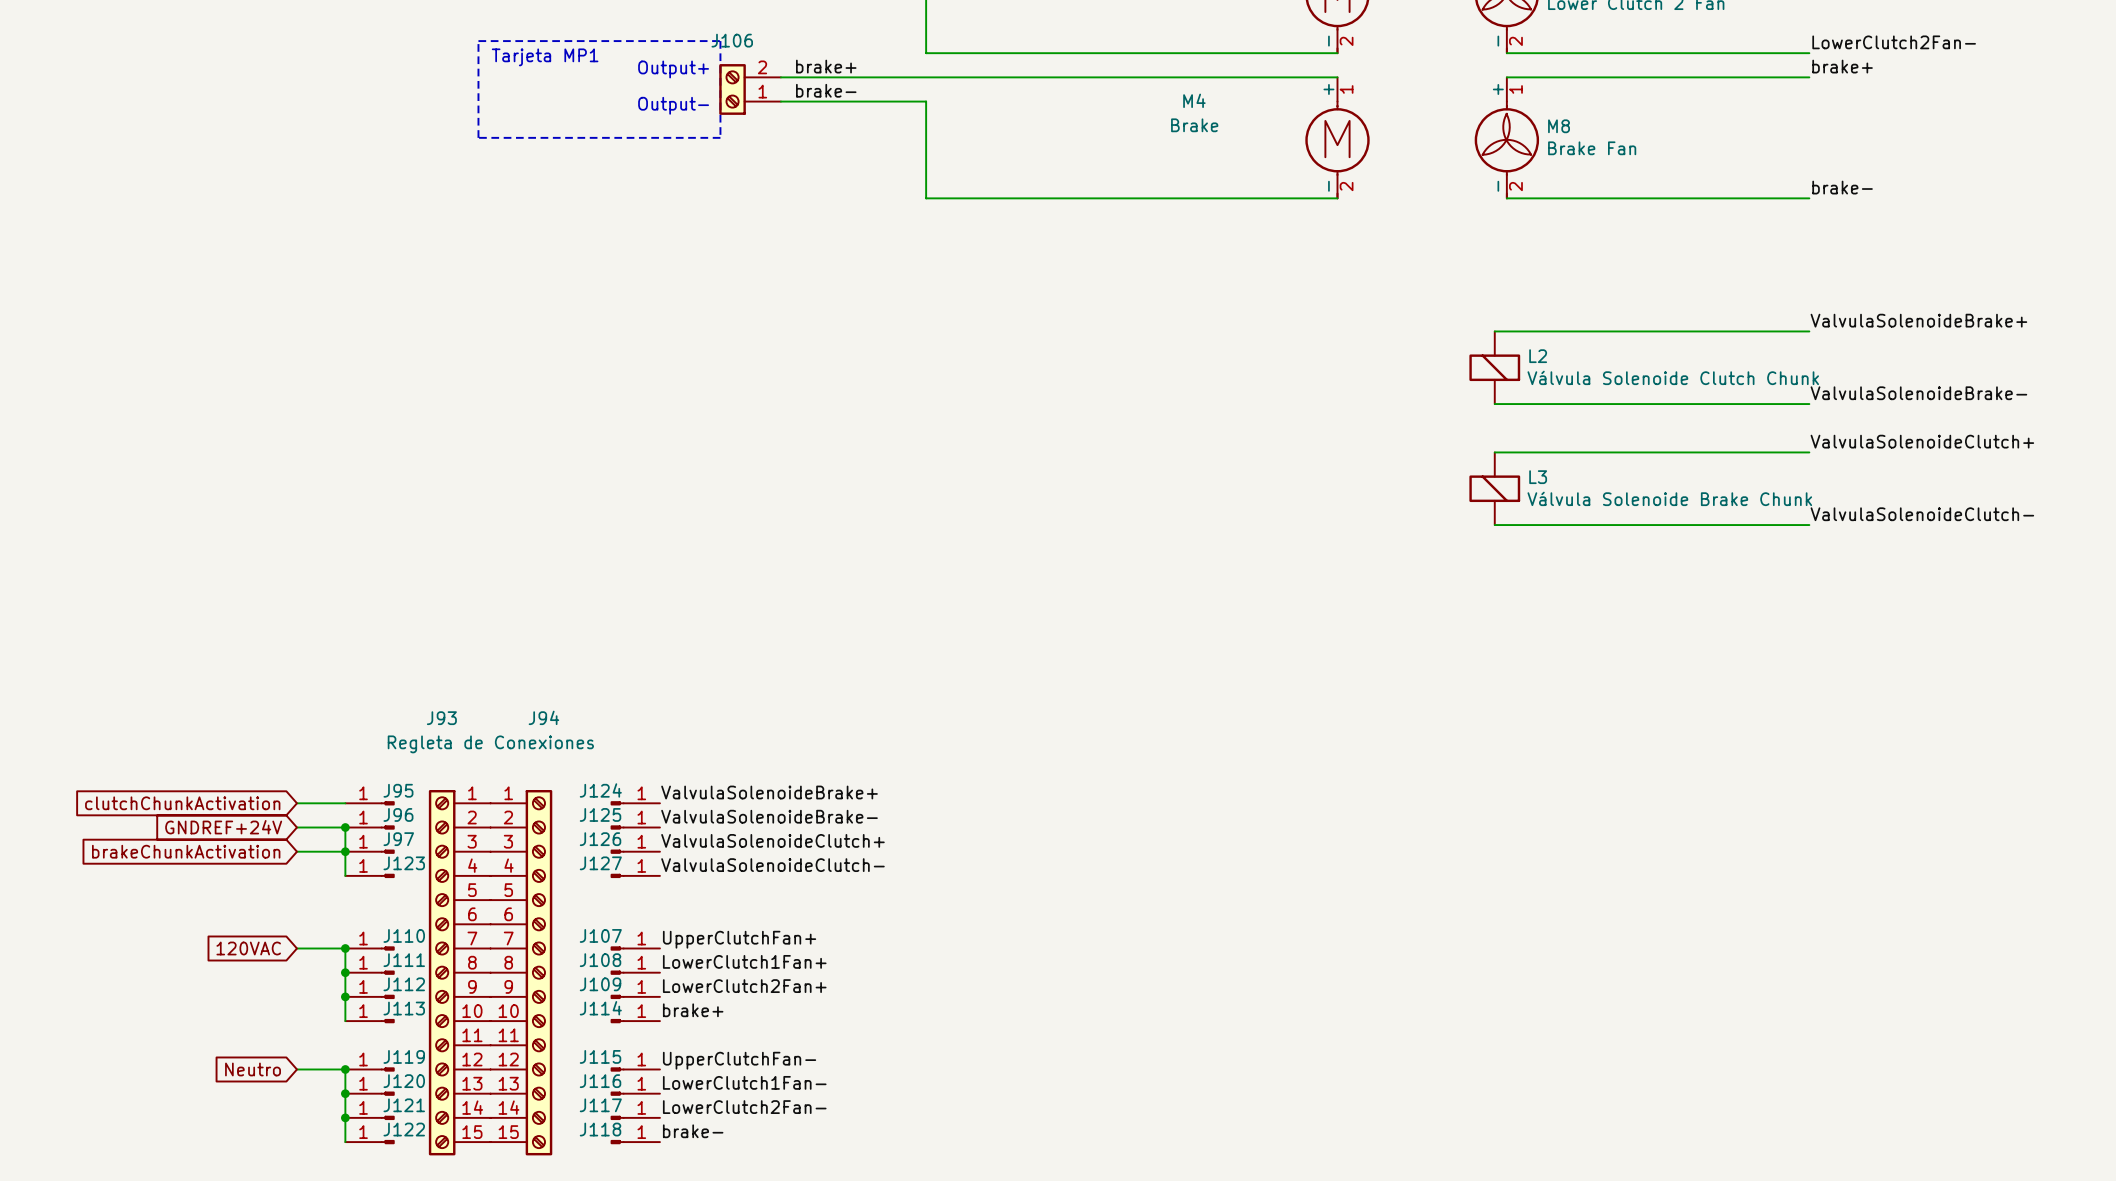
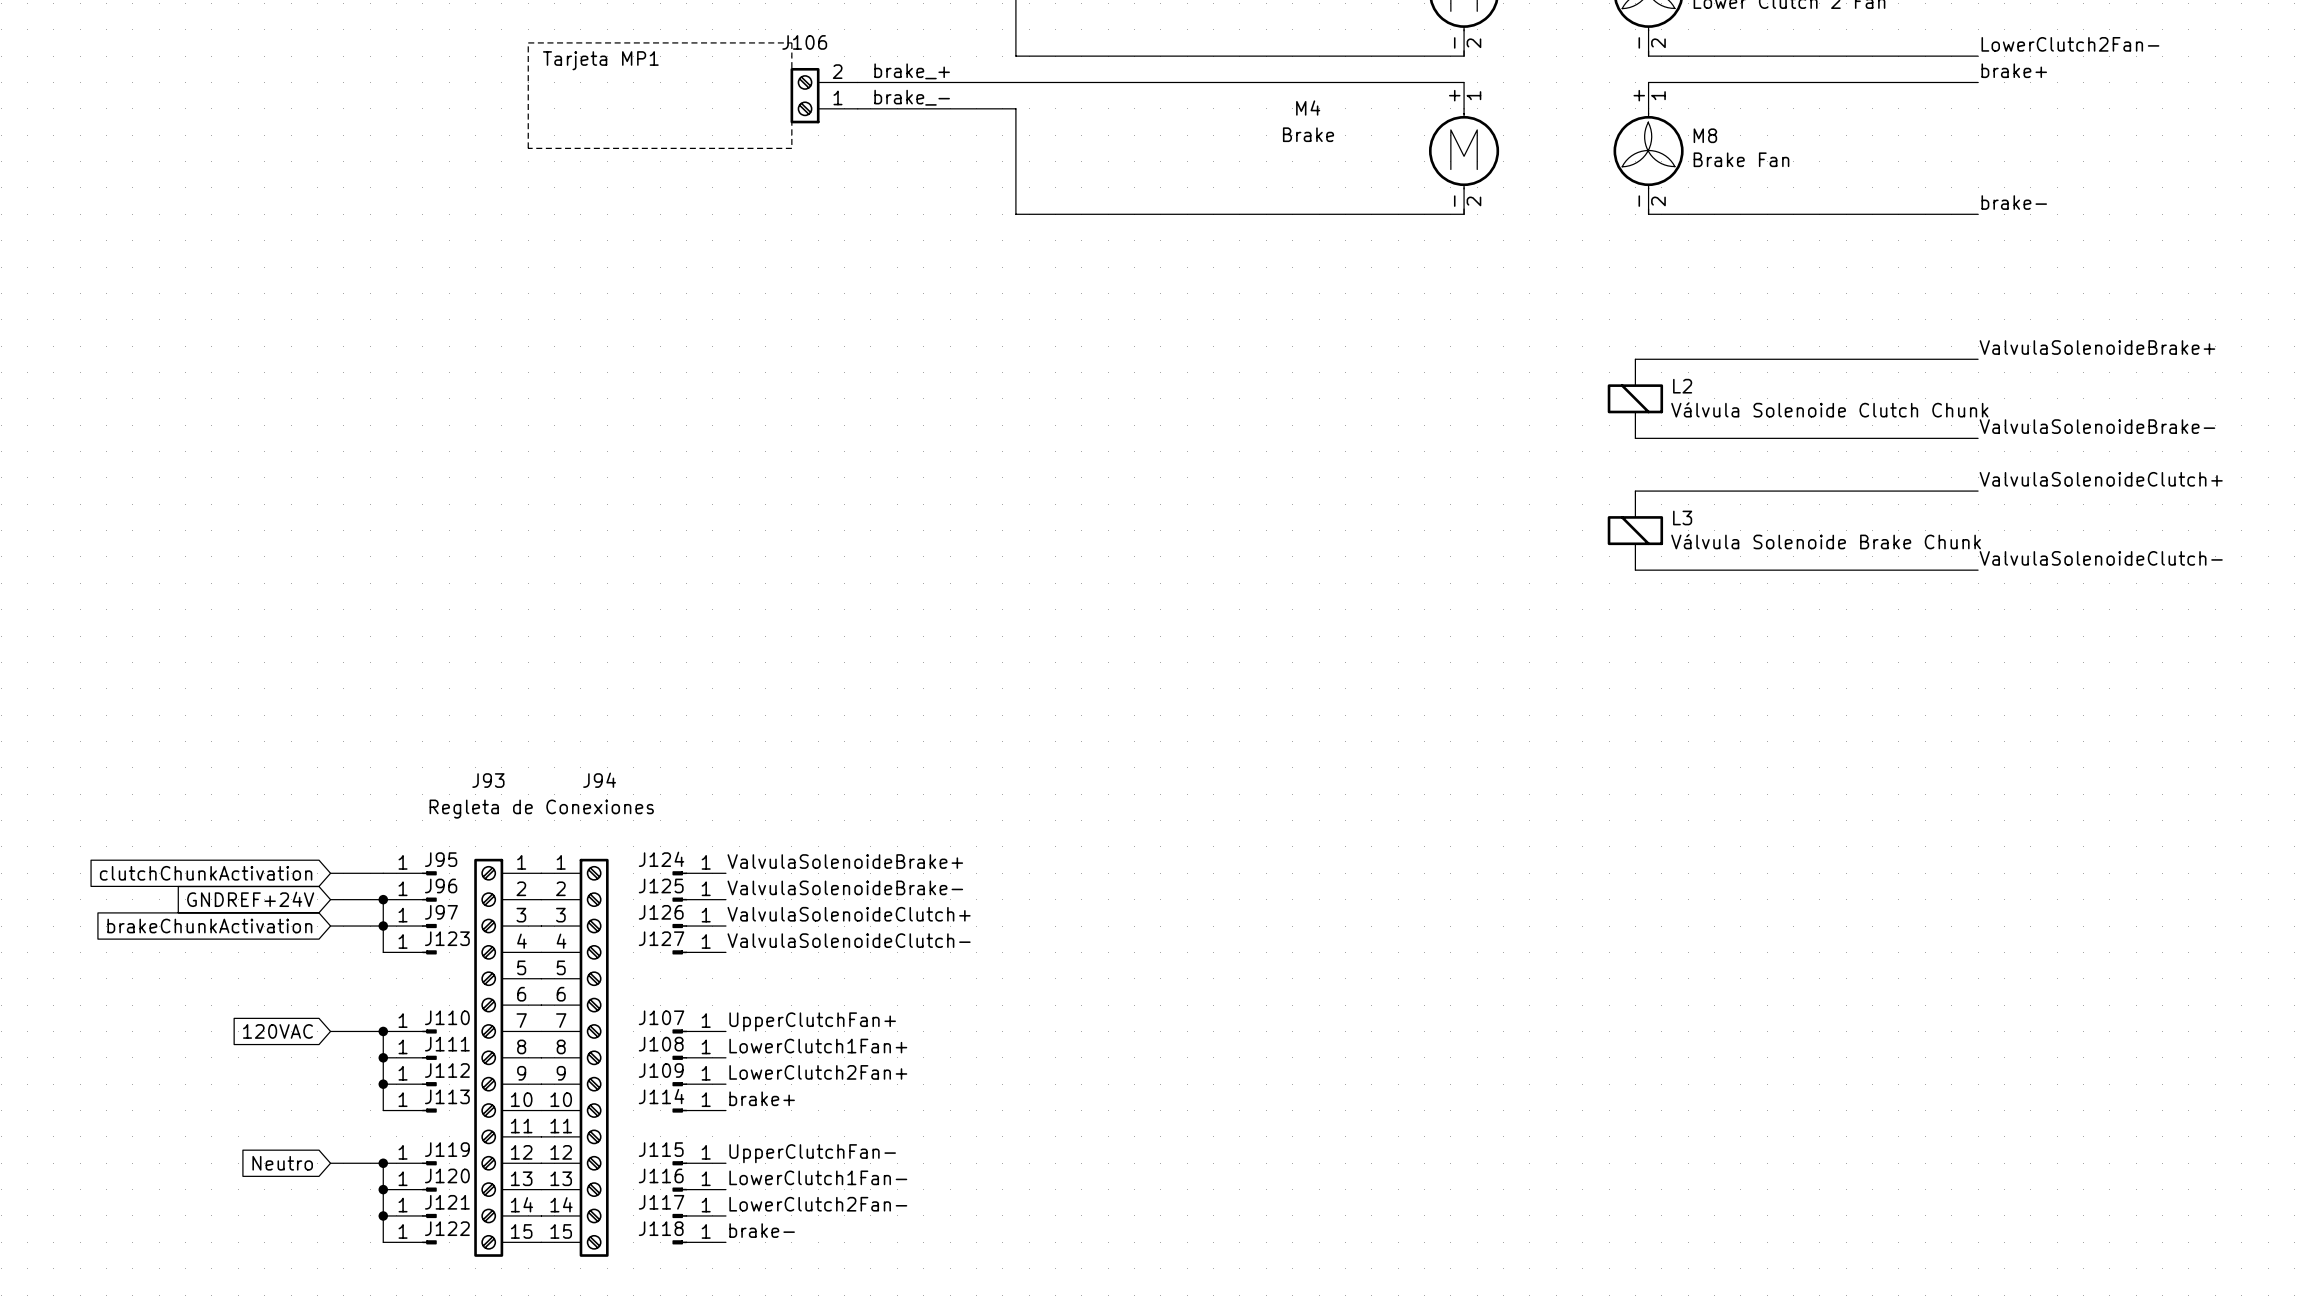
label: brake+ (826, 66) -> brake_+ (912, 71)
text: Output+ (673, 69) -> none
label: brake- (826, 90) -> brake_- (912, 97)
text: Output- (673, 105) -> none

